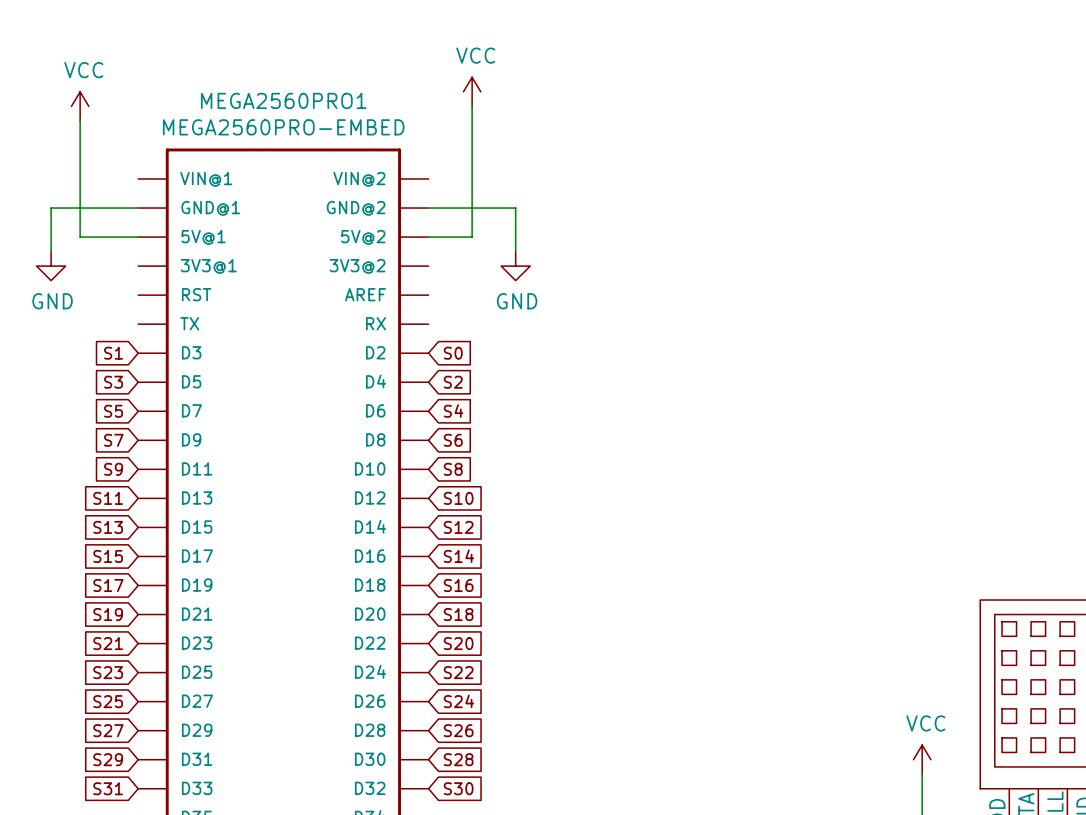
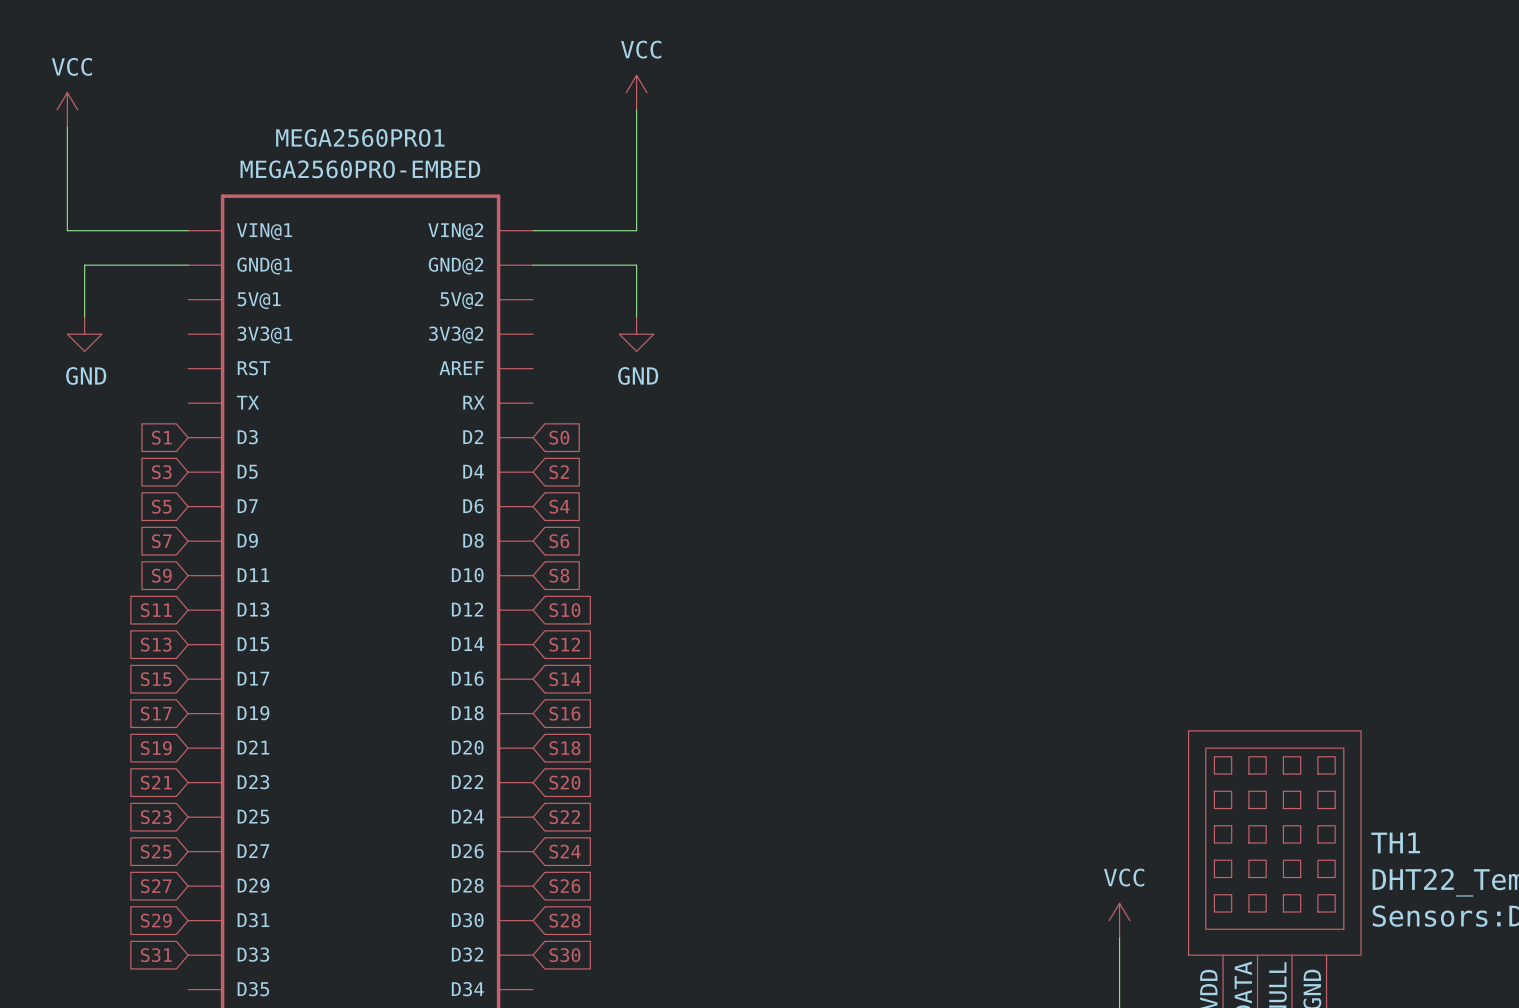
wire: none -> (636, 109) (636, 230) (533, 230)
wire: none -> (67, 127) (67, 230) (188, 230)
power symbol position: VCC (472, 91) -> VCC (636, 92)
power symbol position: VCC (80, 106) -> VCC (67, 109)
wire: (472, 106) (472, 237) (428, 237) -> none
wire: (80, 120) (80, 237) (138, 237) -> none

